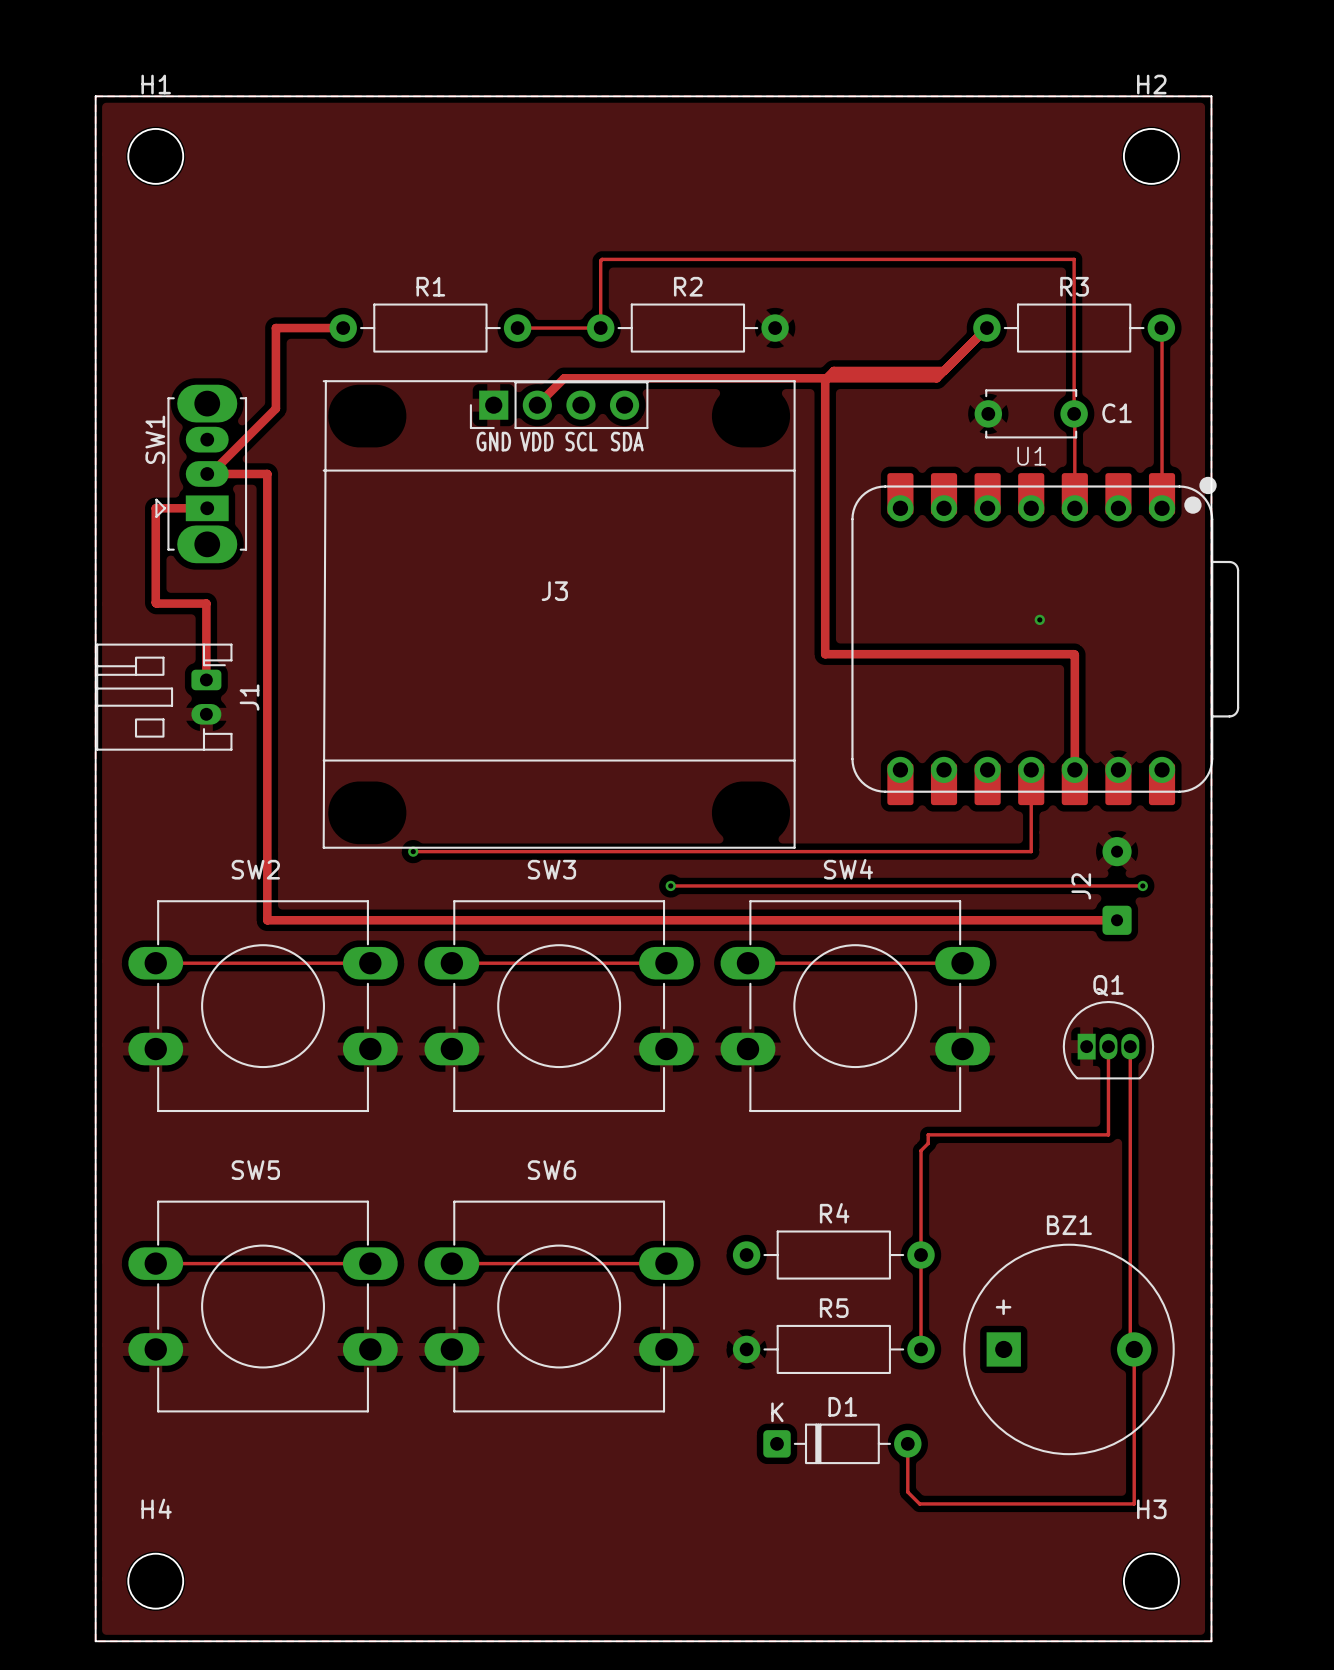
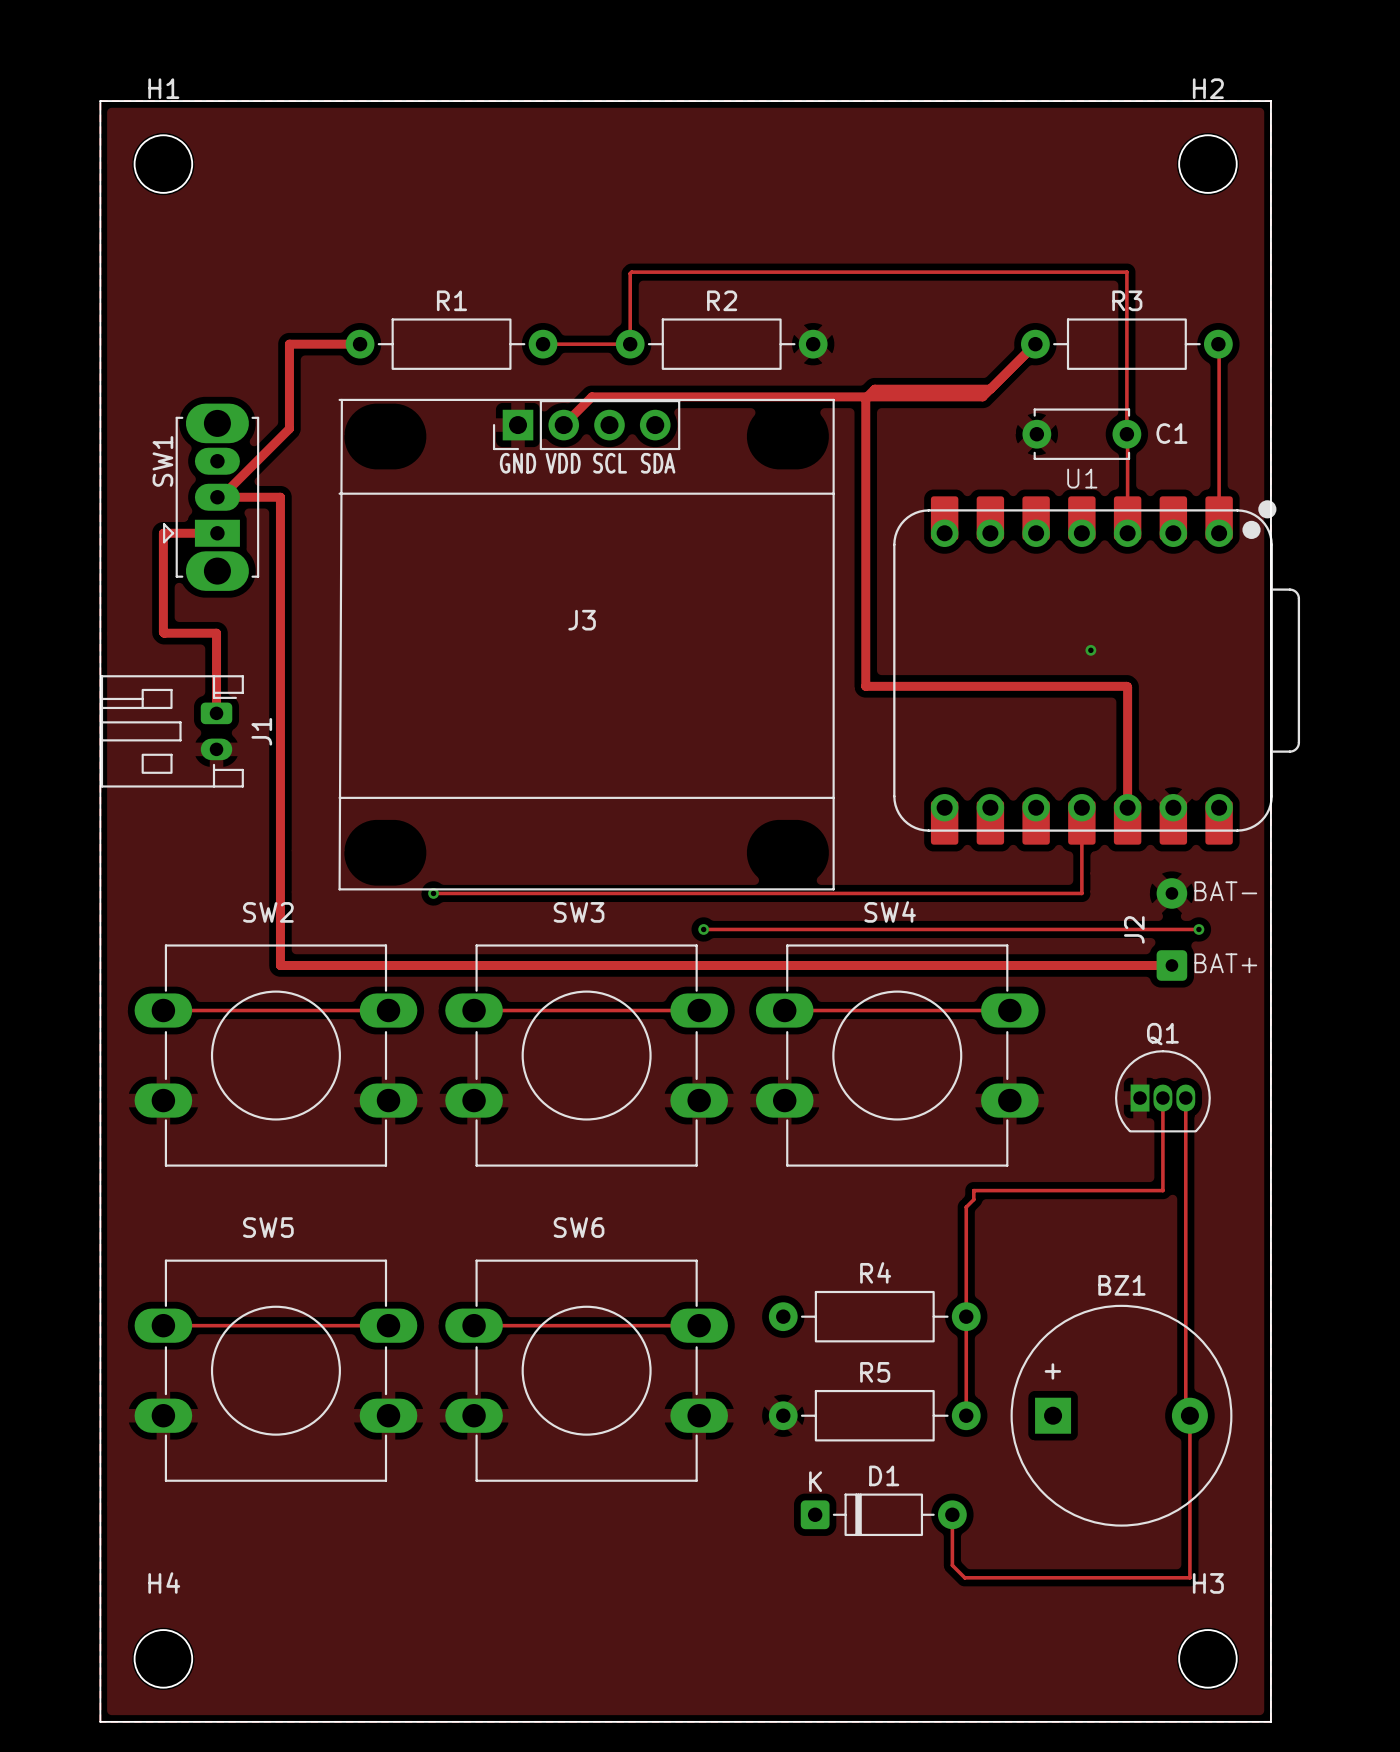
text: none -> BAT- (1225, 891)
text: none -> BAT+ (1225, 963)

